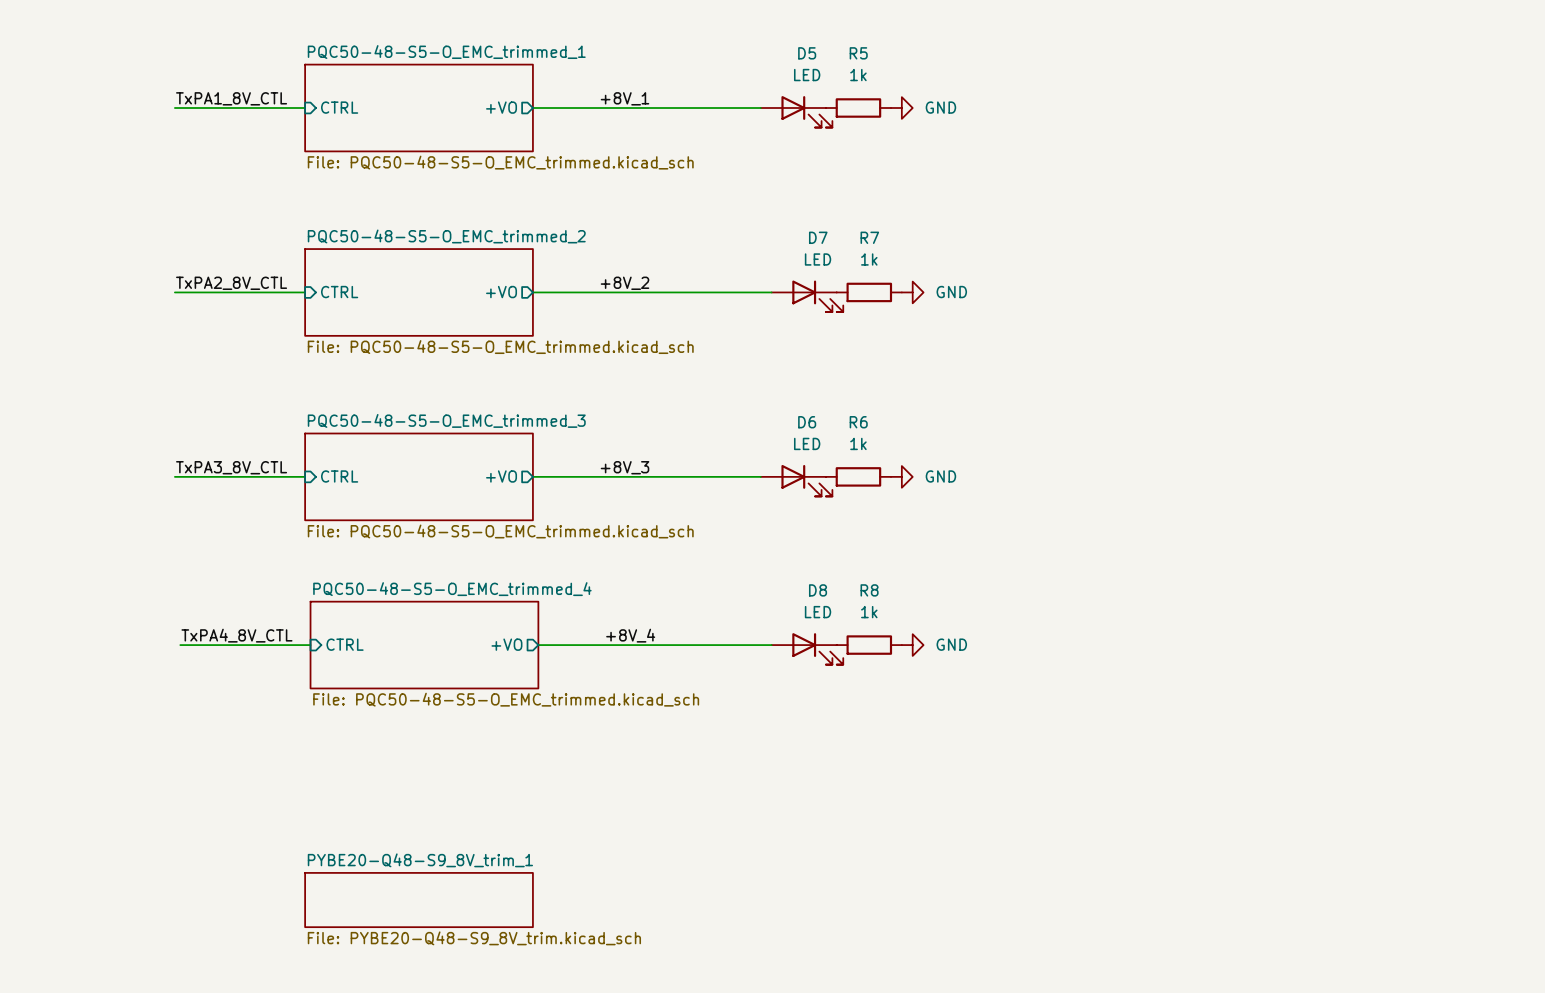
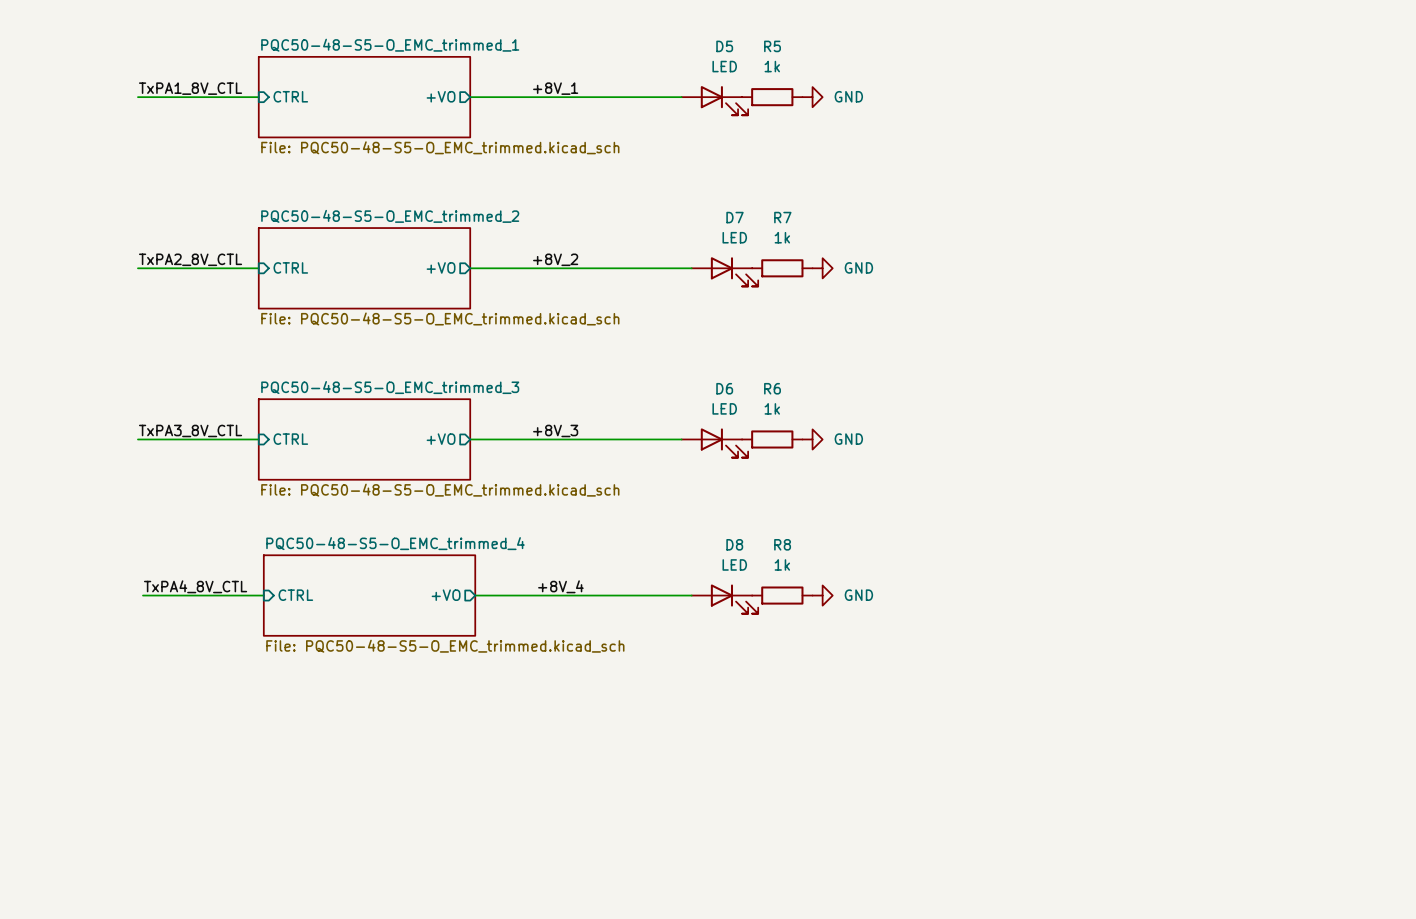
sheet PYBE20-Q48-S9_8V_trim_1: File: PYBE20-Q48-S9_8V_trim.kicad_sch (419, 900) -> none

